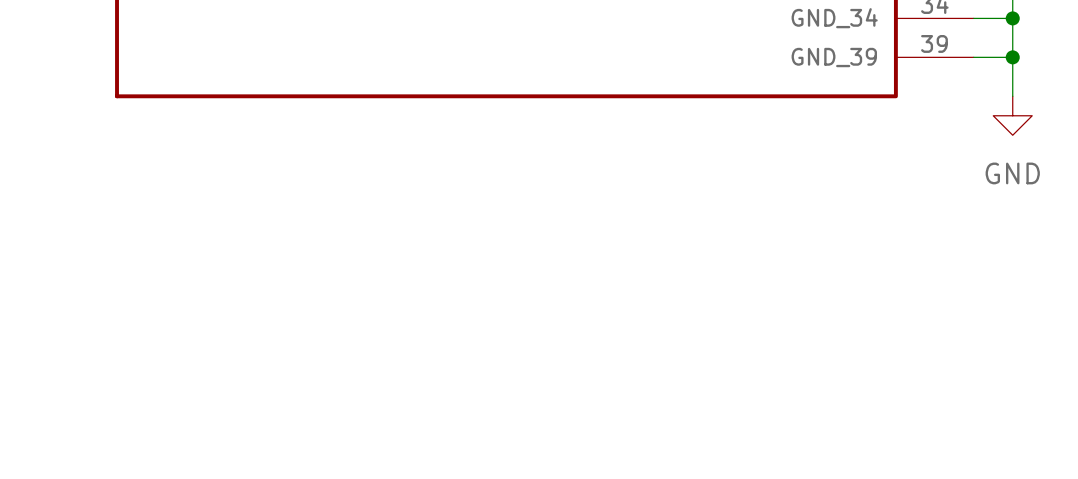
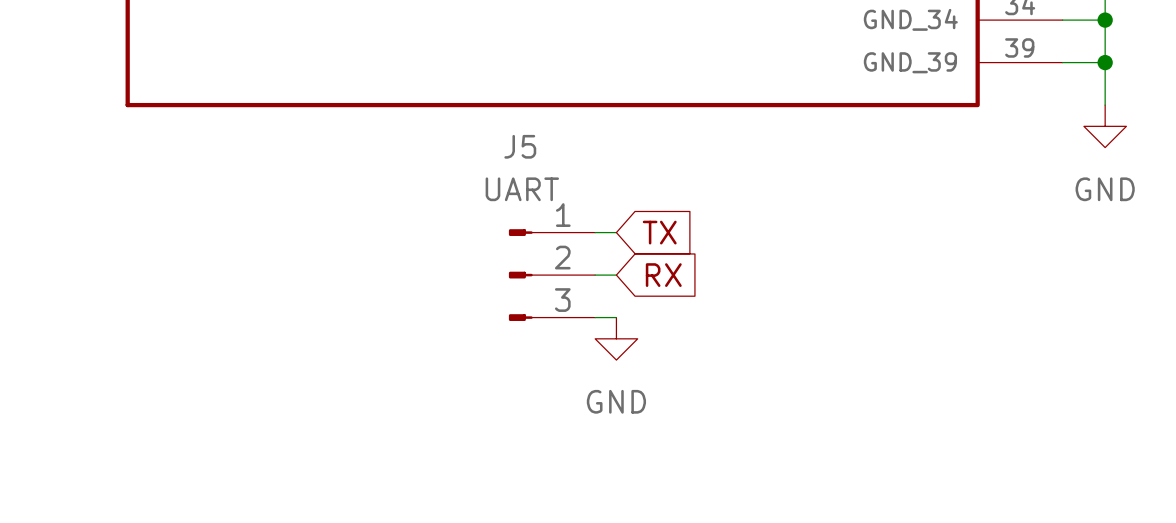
wire: none -> (595, 232) (616, 232)
global label: none -> TX (659, 232)
J5: none -> UART (552, 275)
wire: none -> (595, 275) (616, 275)
global label: none -> RX (663, 275)
wire: none -> (595, 317) (616, 317)
power symbol: none -> GND (616, 338)

